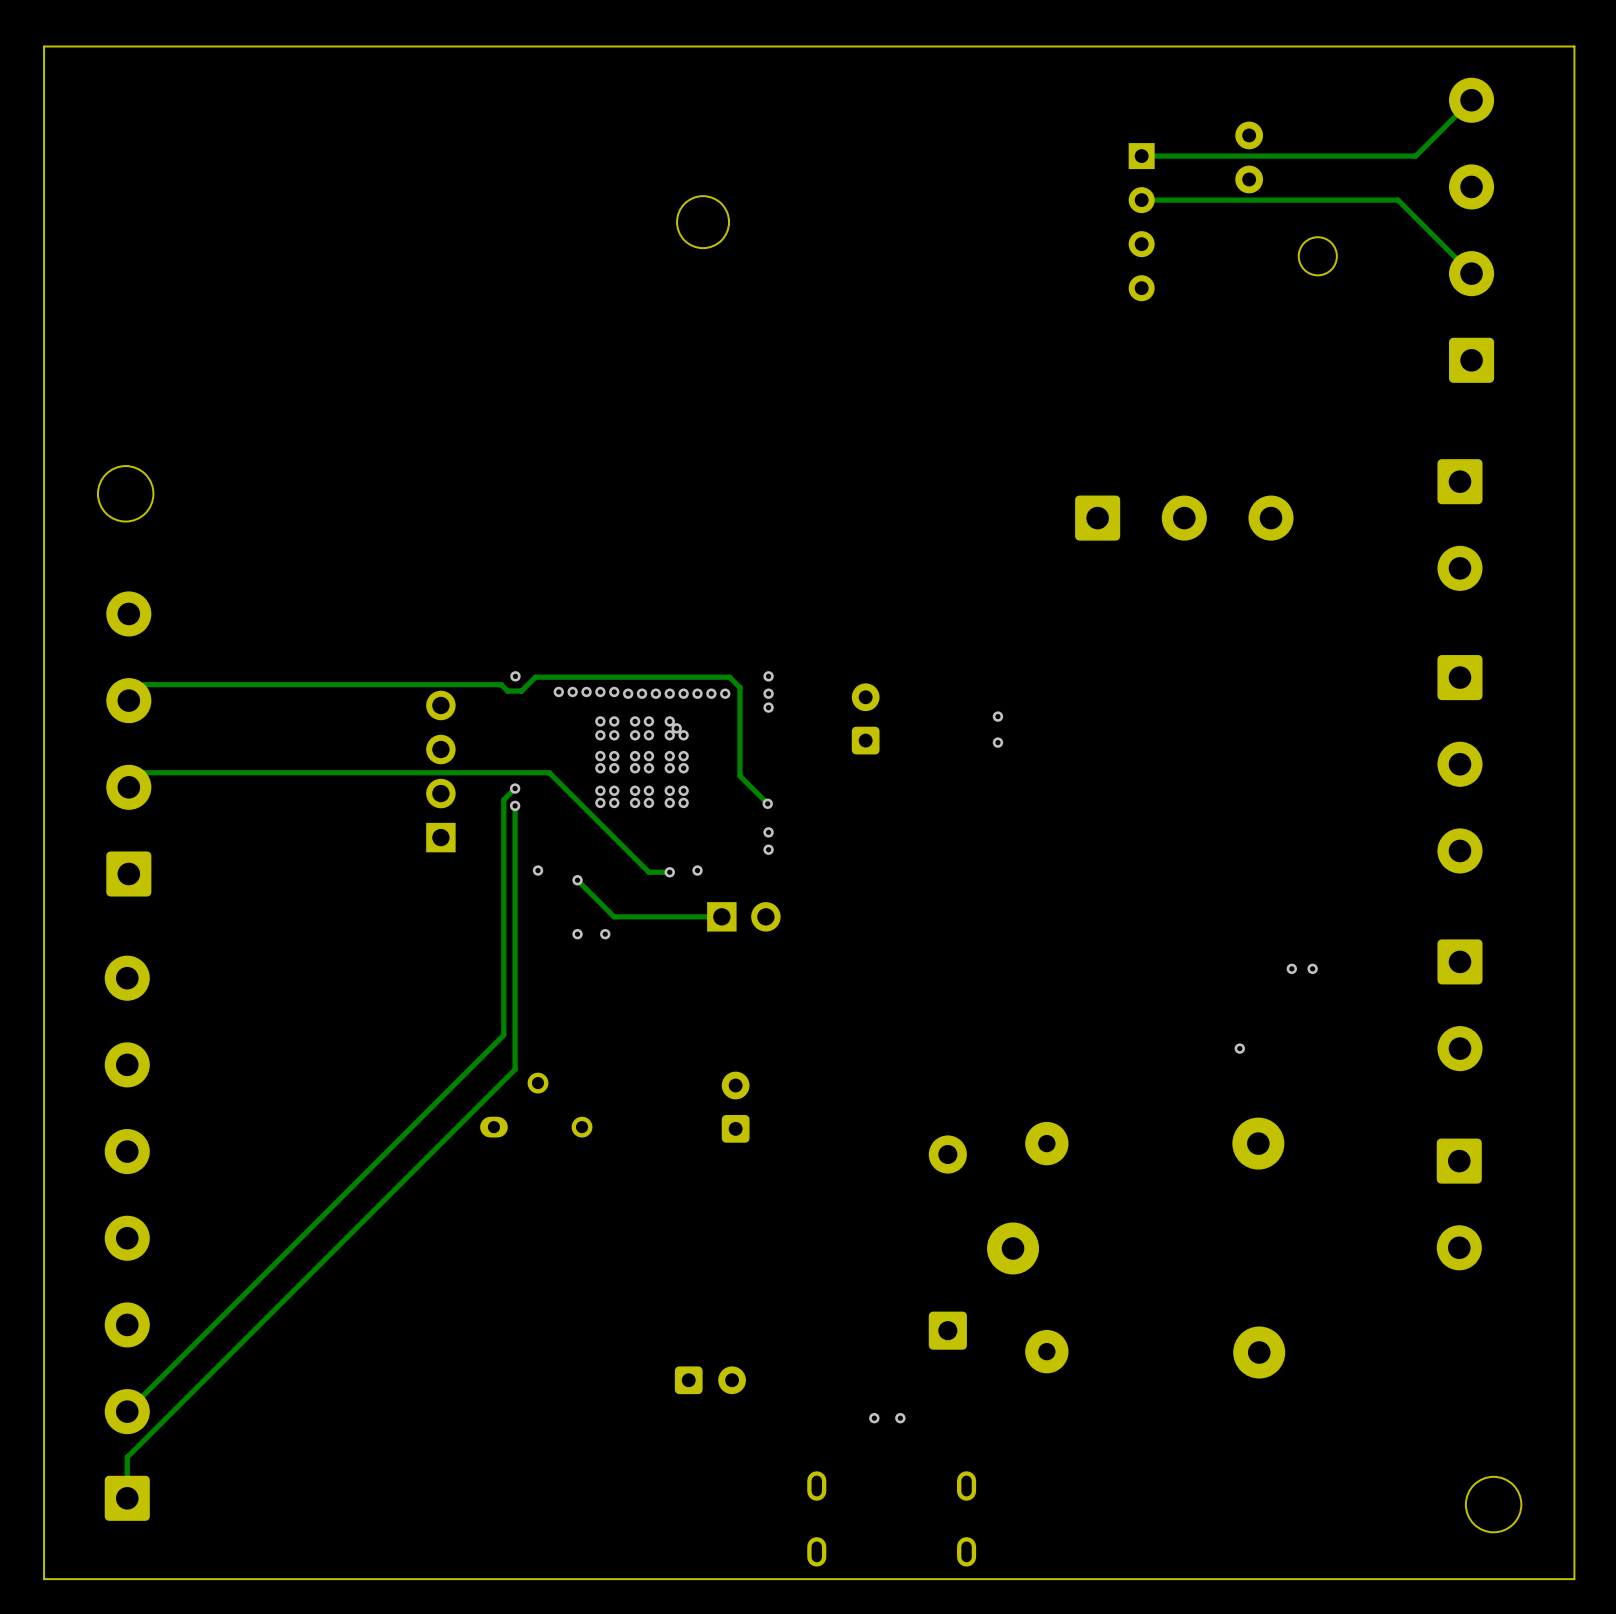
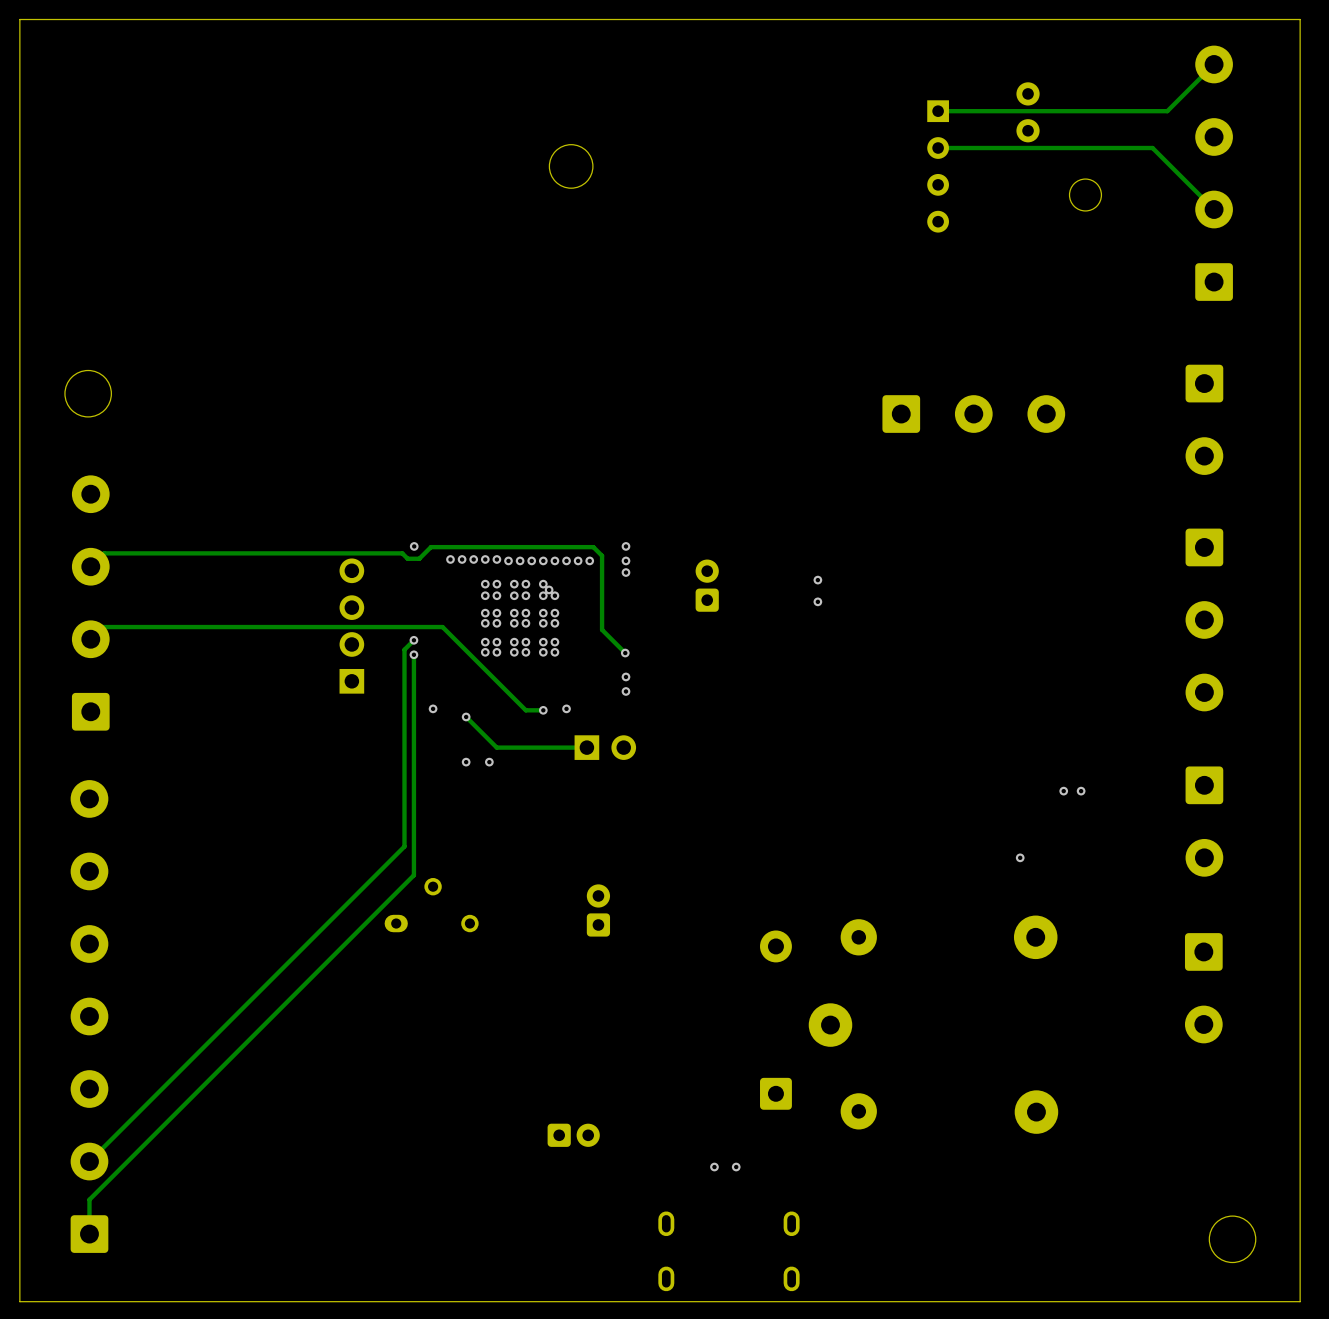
part footprint: [851, 683, 880, 755] -> [695, 559, 719, 612]
part footprint: [721, 1071, 750, 1143] -> [586, 884, 611, 937]
part footprint: [674, 1366, 746, 1395] -> [547, 1123, 600, 1147]

